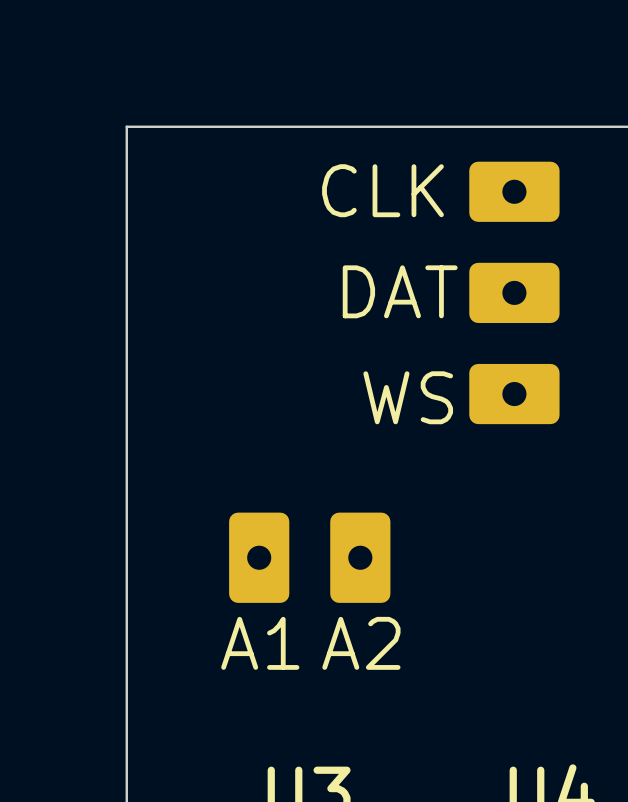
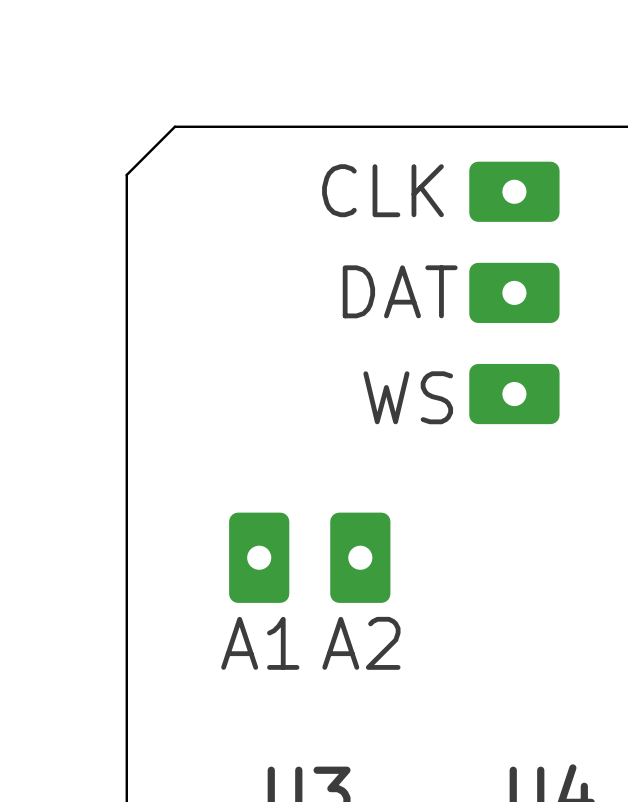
board edge: (174, 126) (126, 126) (126, 174) -> (174, 126) (126, 174)

